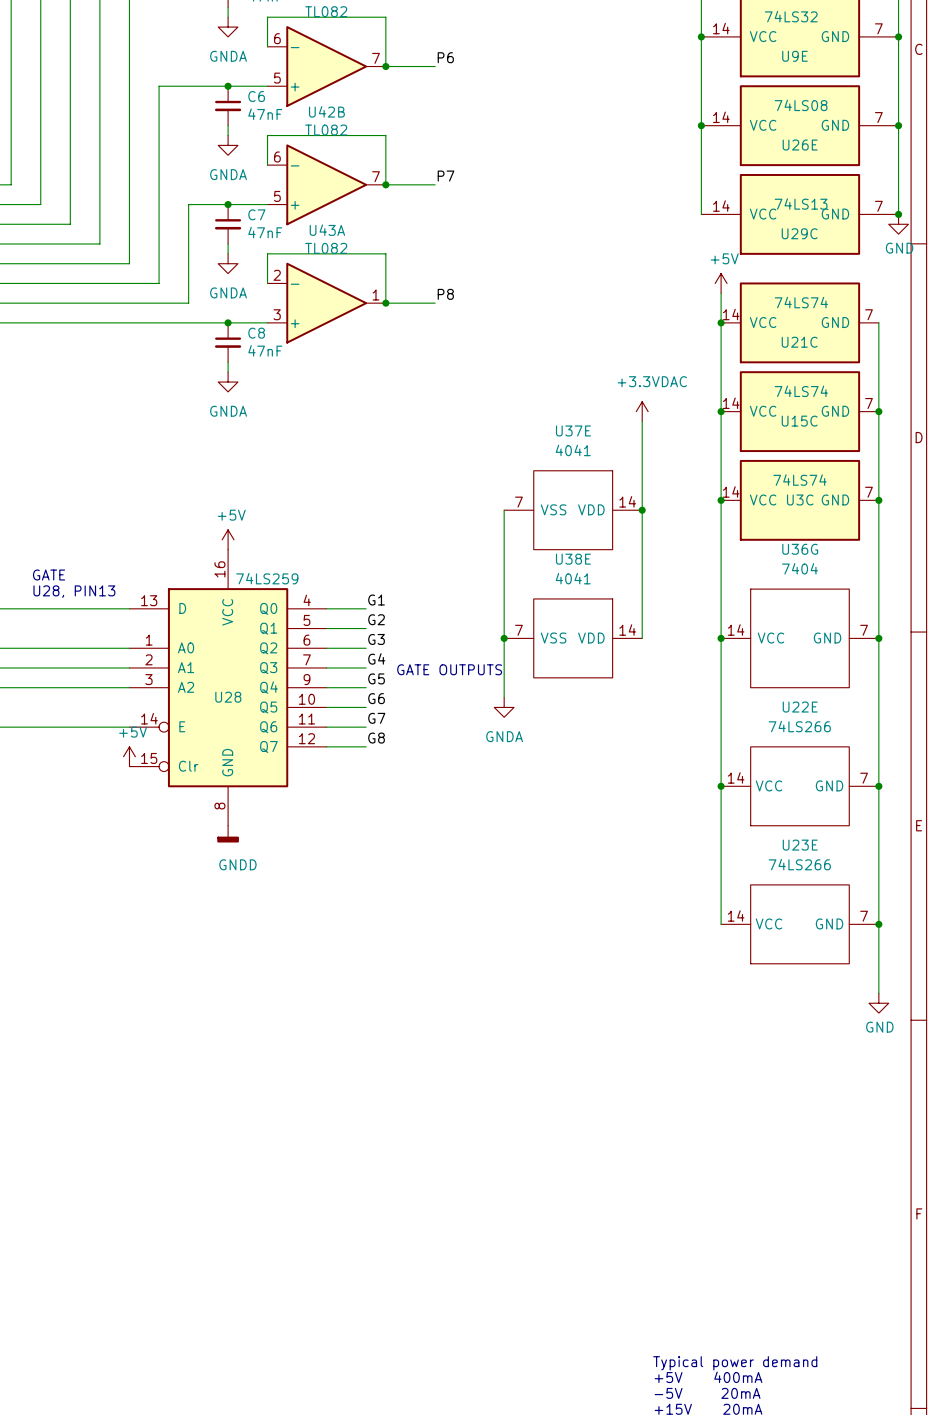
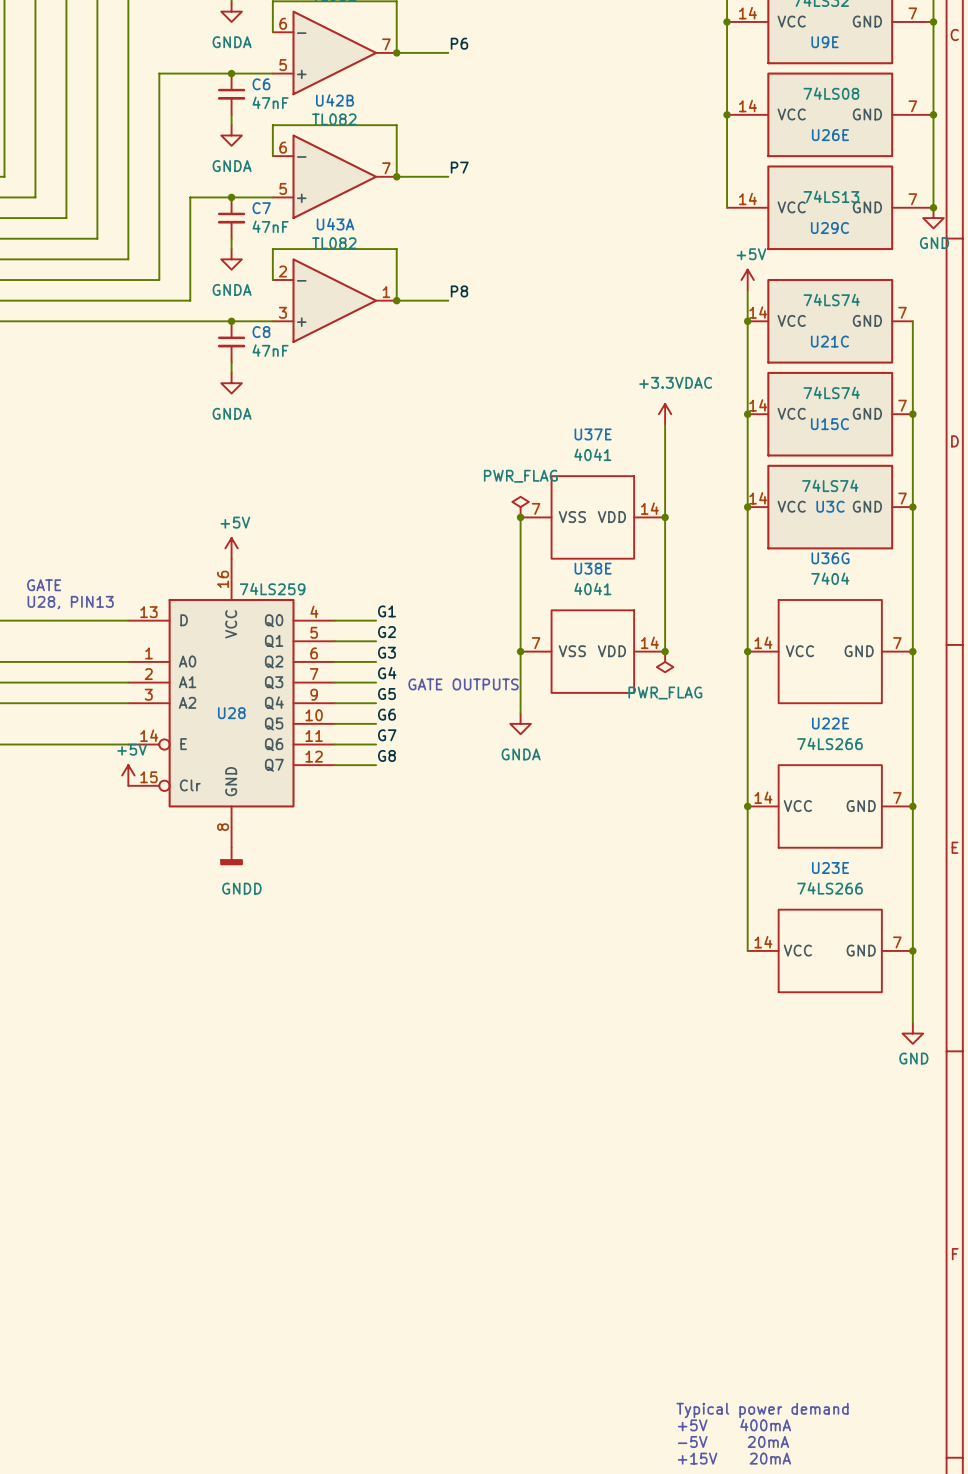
power symbol: none -> PWR_FLAG (520, 507)
junction: none -> (520, 517)
junction: none -> (665, 651)
power symbol: none -> PWR_FLAG (665, 661)

